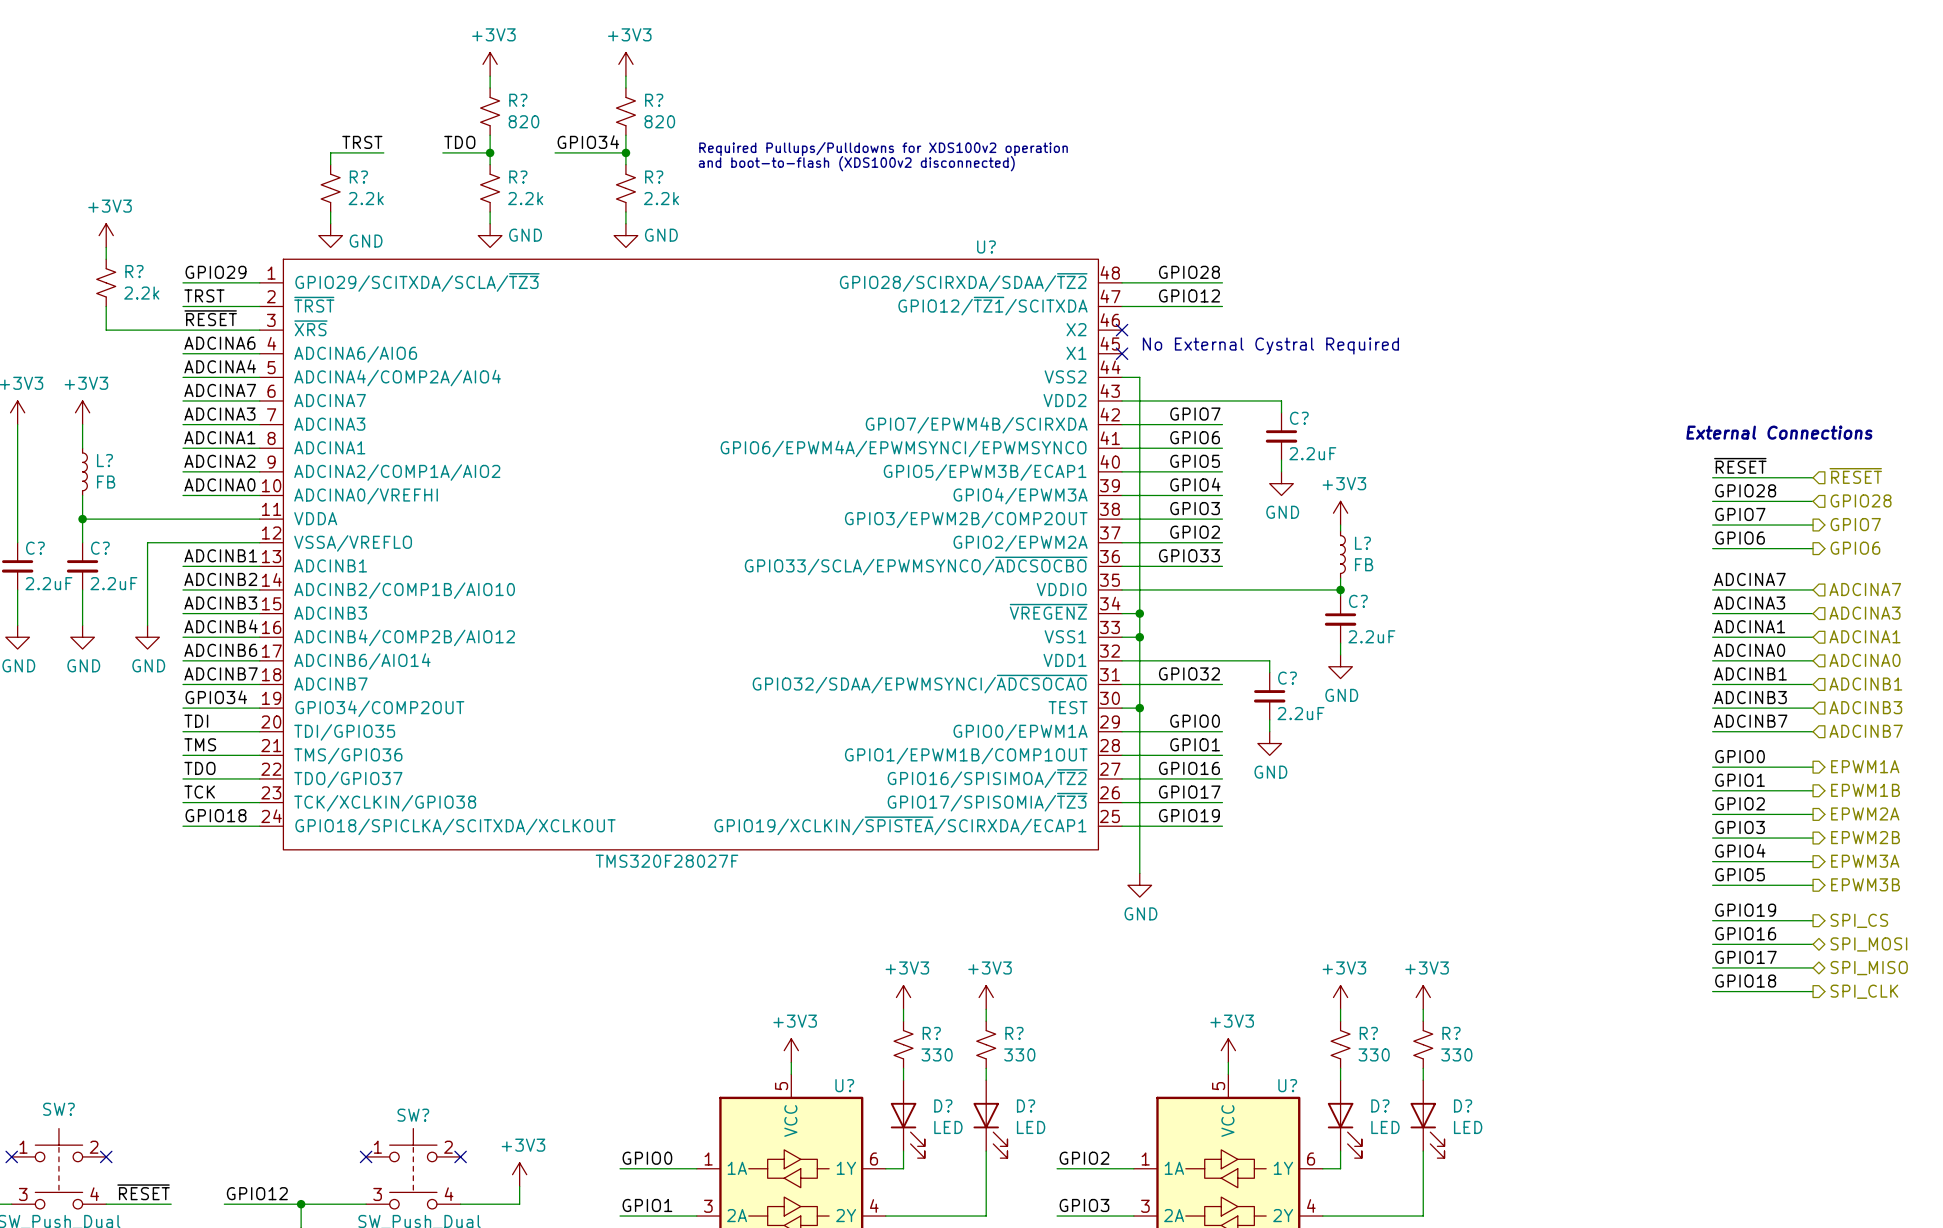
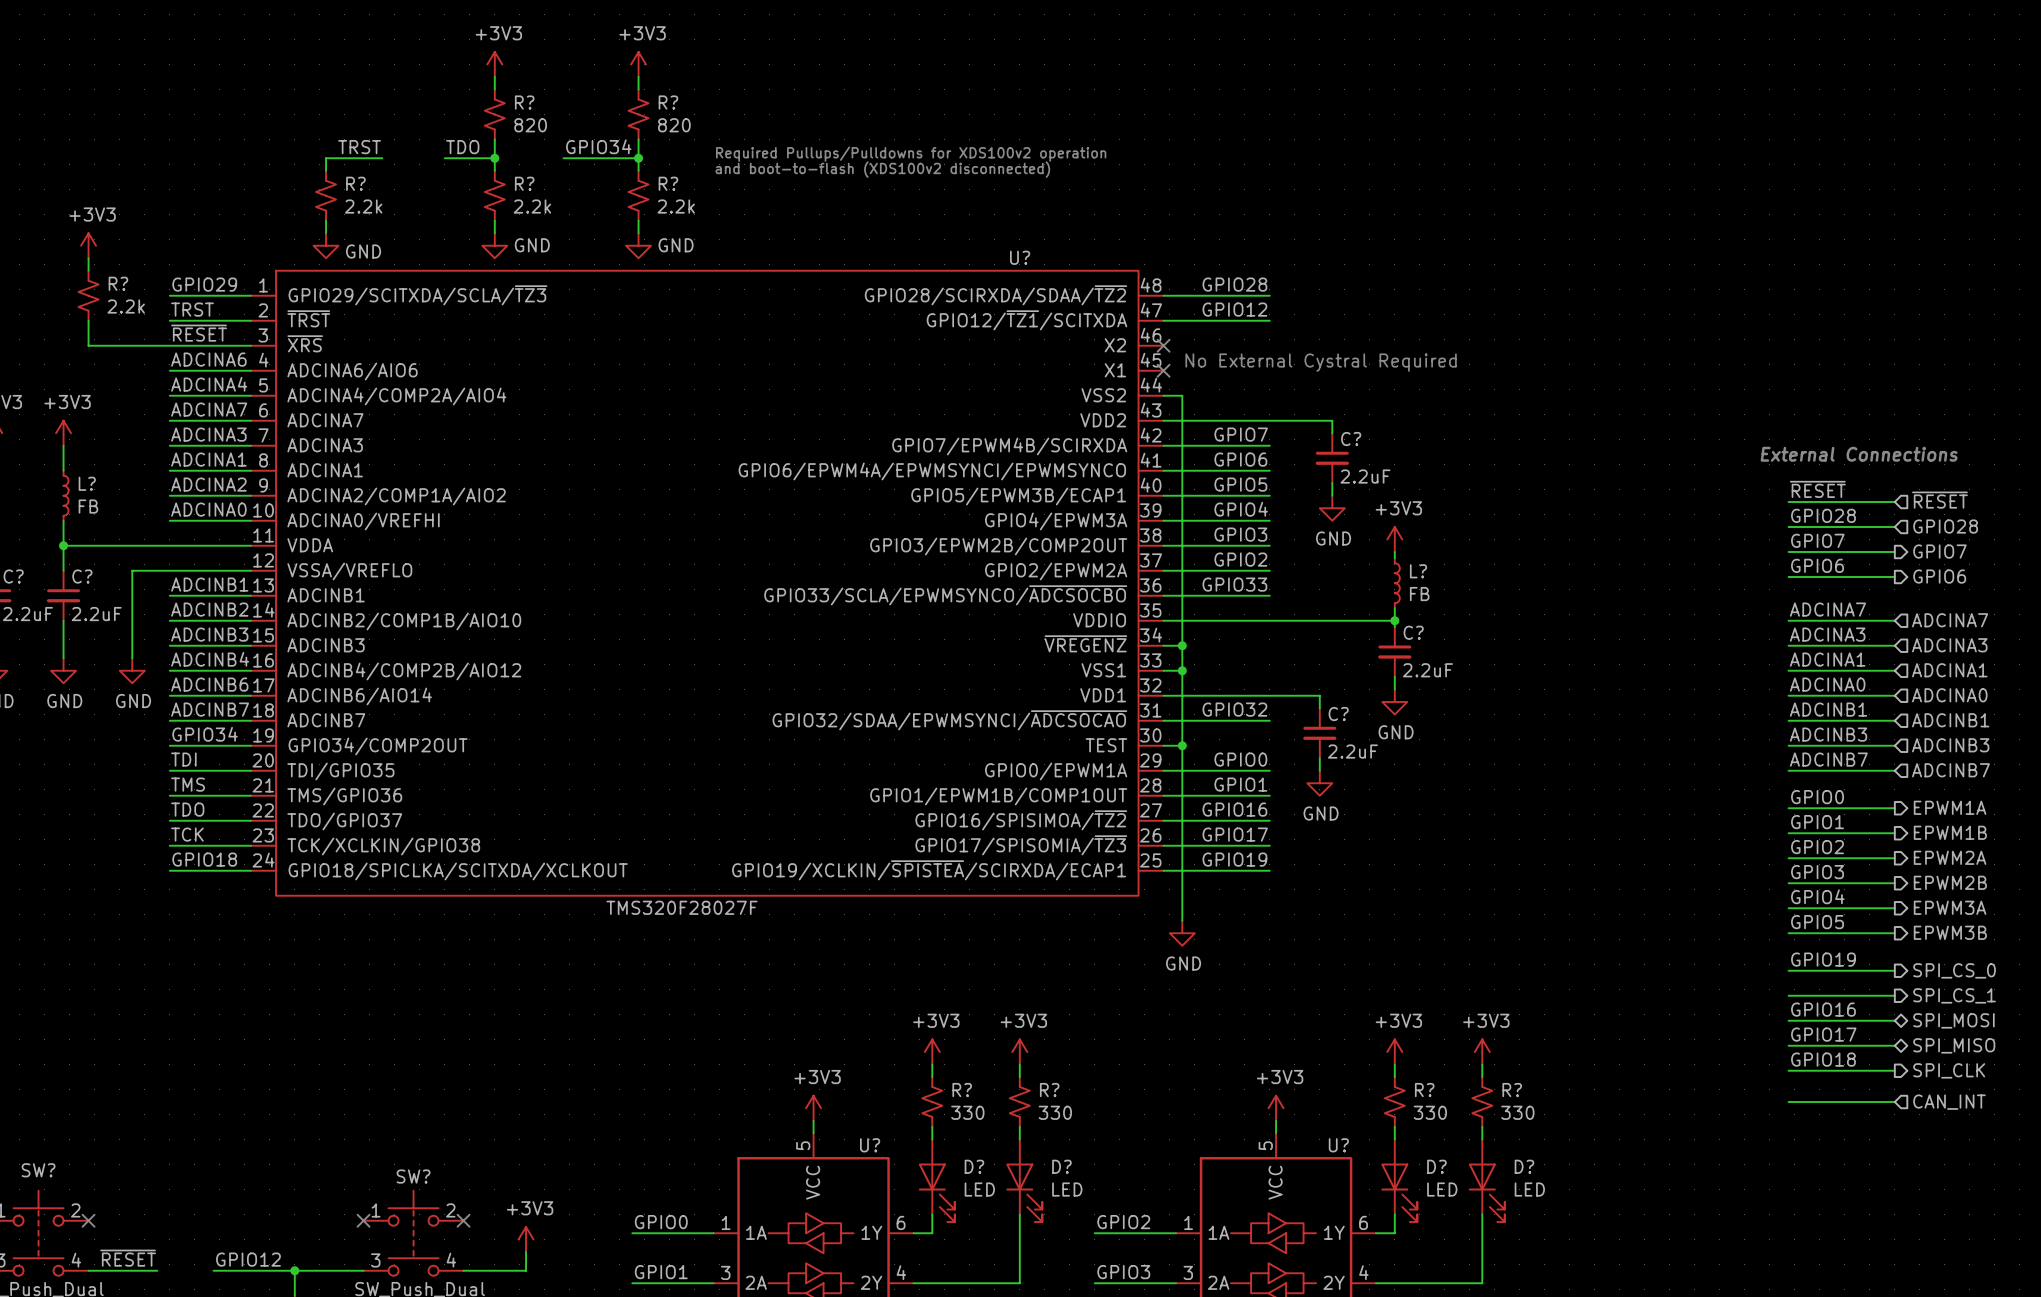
hierarchical label: SPI_CS (1859, 920) -> SPI_CS_0 (1954, 970)
label: GPIO16 (1745, 933) -> none
hierarchical label shape: bidirectional (1868, 944) -> output (1954, 995)
hierarchical label: SPI_MOSI (1868, 944) -> SPI_CS_1 (1954, 995)
label: GPIO17 (1745, 957) -> GPIO16 (1823, 1009)
hierarchical label: SPI_MISO (1869, 968) -> SPI_MOSI (1953, 1020)
label: GPIO18 (1745, 981) -> GPIO17 (1823, 1034)
hierarchical label shape: output (1864, 991) -> bidirectional (1954, 1045)
hierarchical label: SPI_CLK (1864, 991) -> SPI_MISO (1954, 1045)
label: none -> GPIO18 (1823, 1059)
wire: none -> (1788, 1070) (1894, 1070)
hierarchical label: none -> SPI_CLK (1949, 1070)
wire: none -> (1788, 1102) (1894, 1102)
hierarchical label: none -> CAN_INT (1949, 1102)

